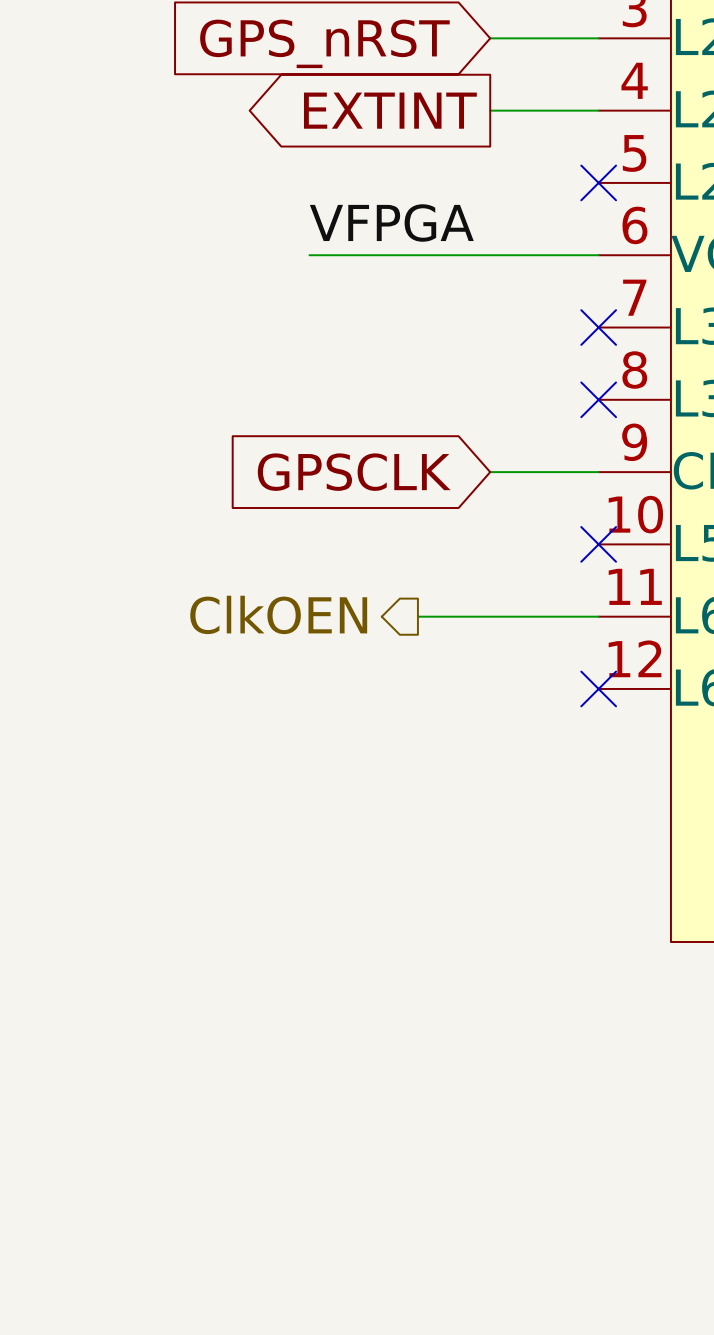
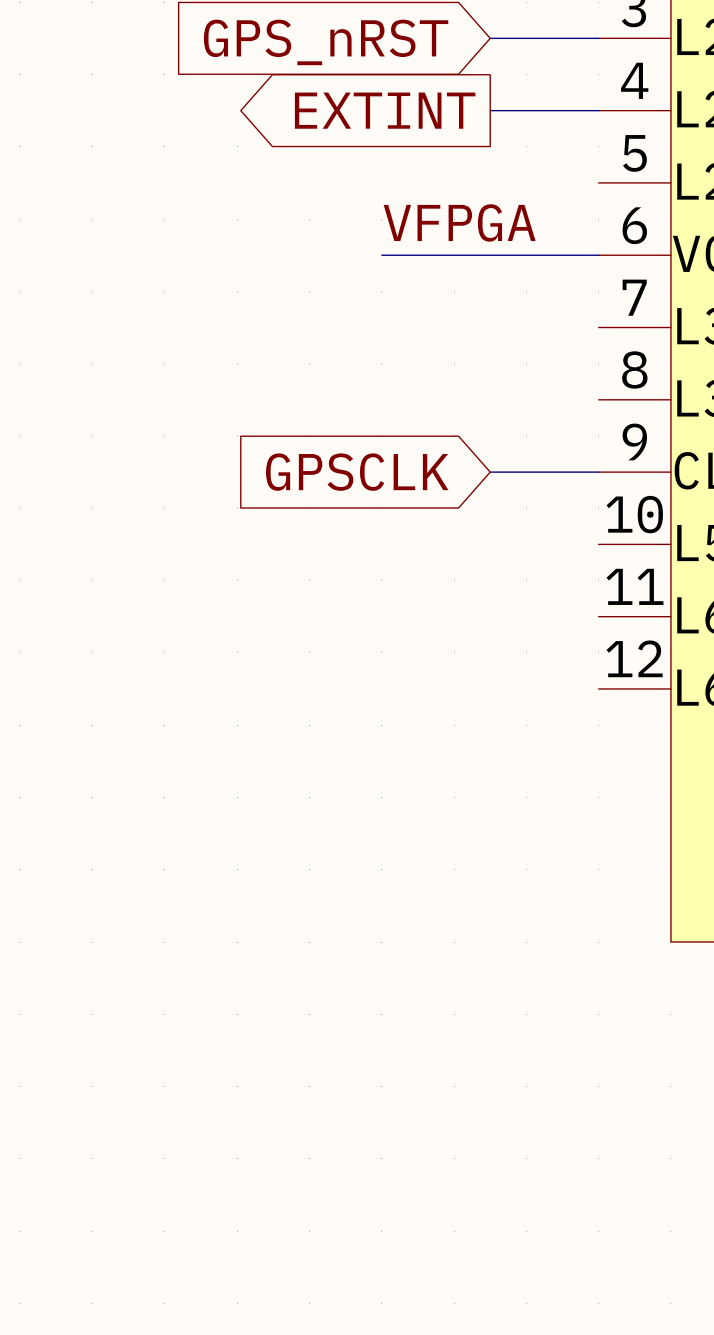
no-connect mark: (598, 182) -> none
label position: VFPGA (391, 222) -> VFPGA (459, 222)
wire: (309, 255) (381, 255) -> none
no-connect mark: (598, 327) -> none
no-connect mark: (598, 399) -> none
no-connect mark: (598, 544) -> none
hierarchical label: ClkOEN (278, 614) -> none
wire: (417, 616) (598, 616) -> none
no-connect mark: (598, 688) -> none

